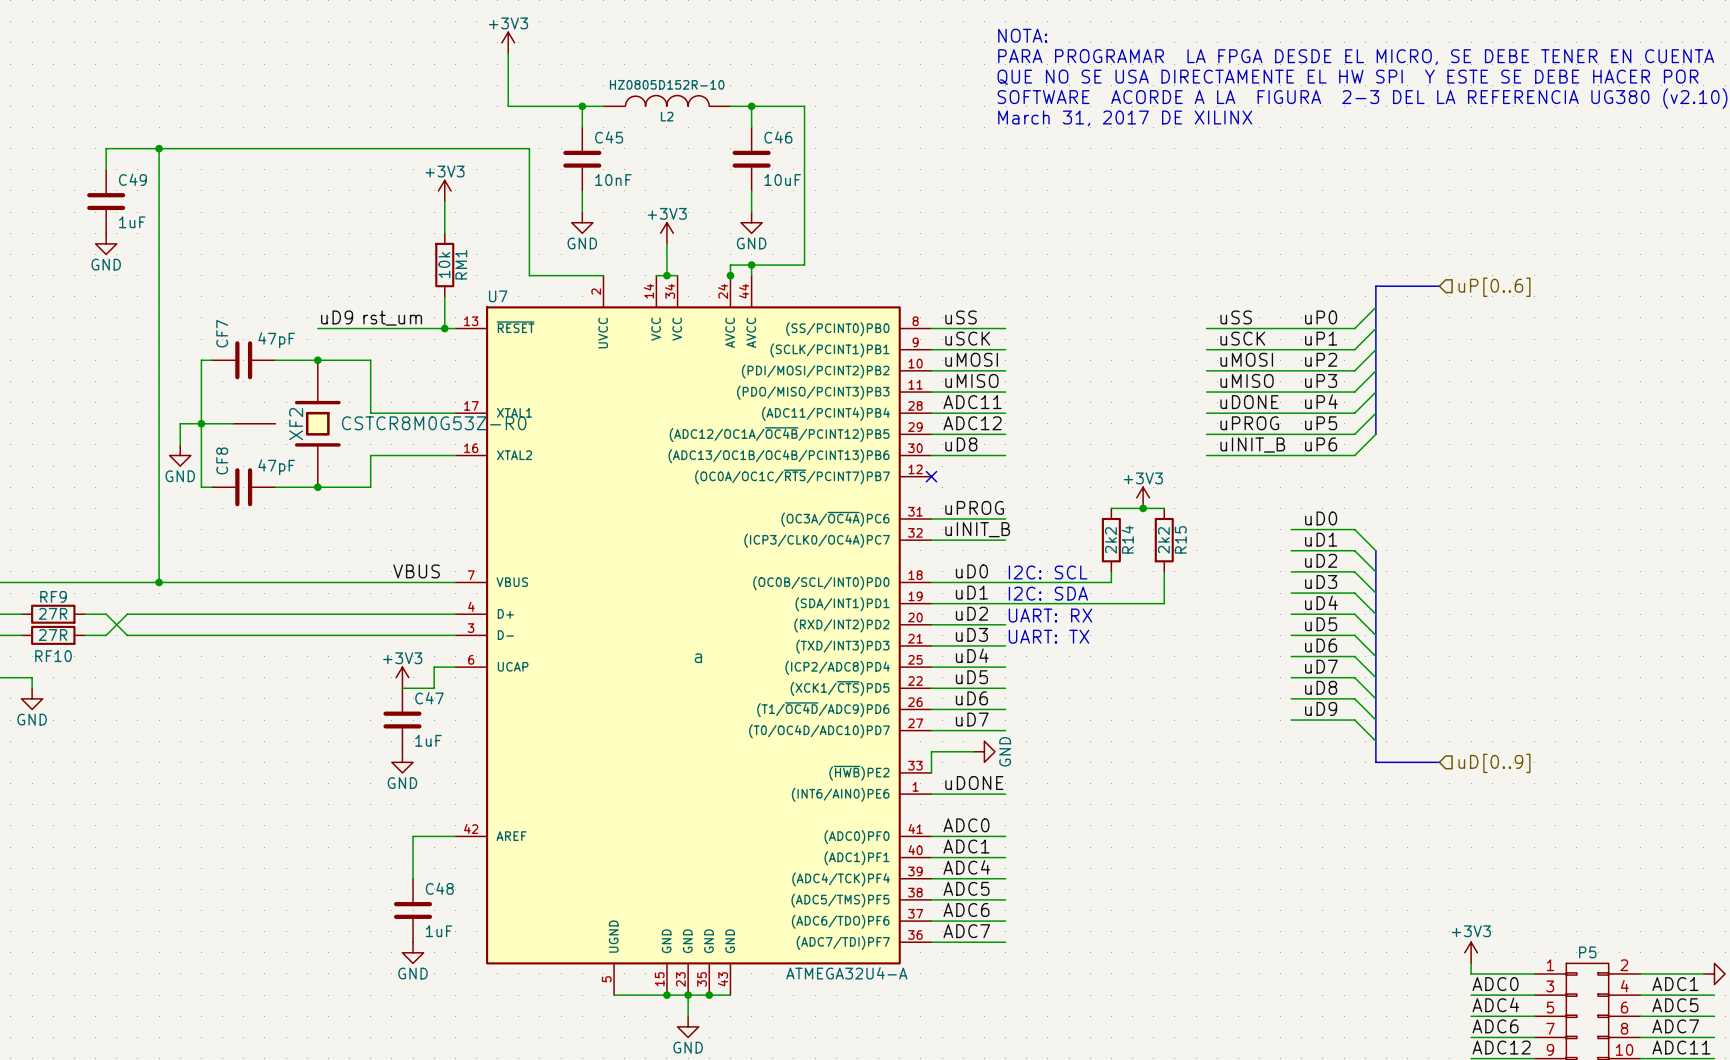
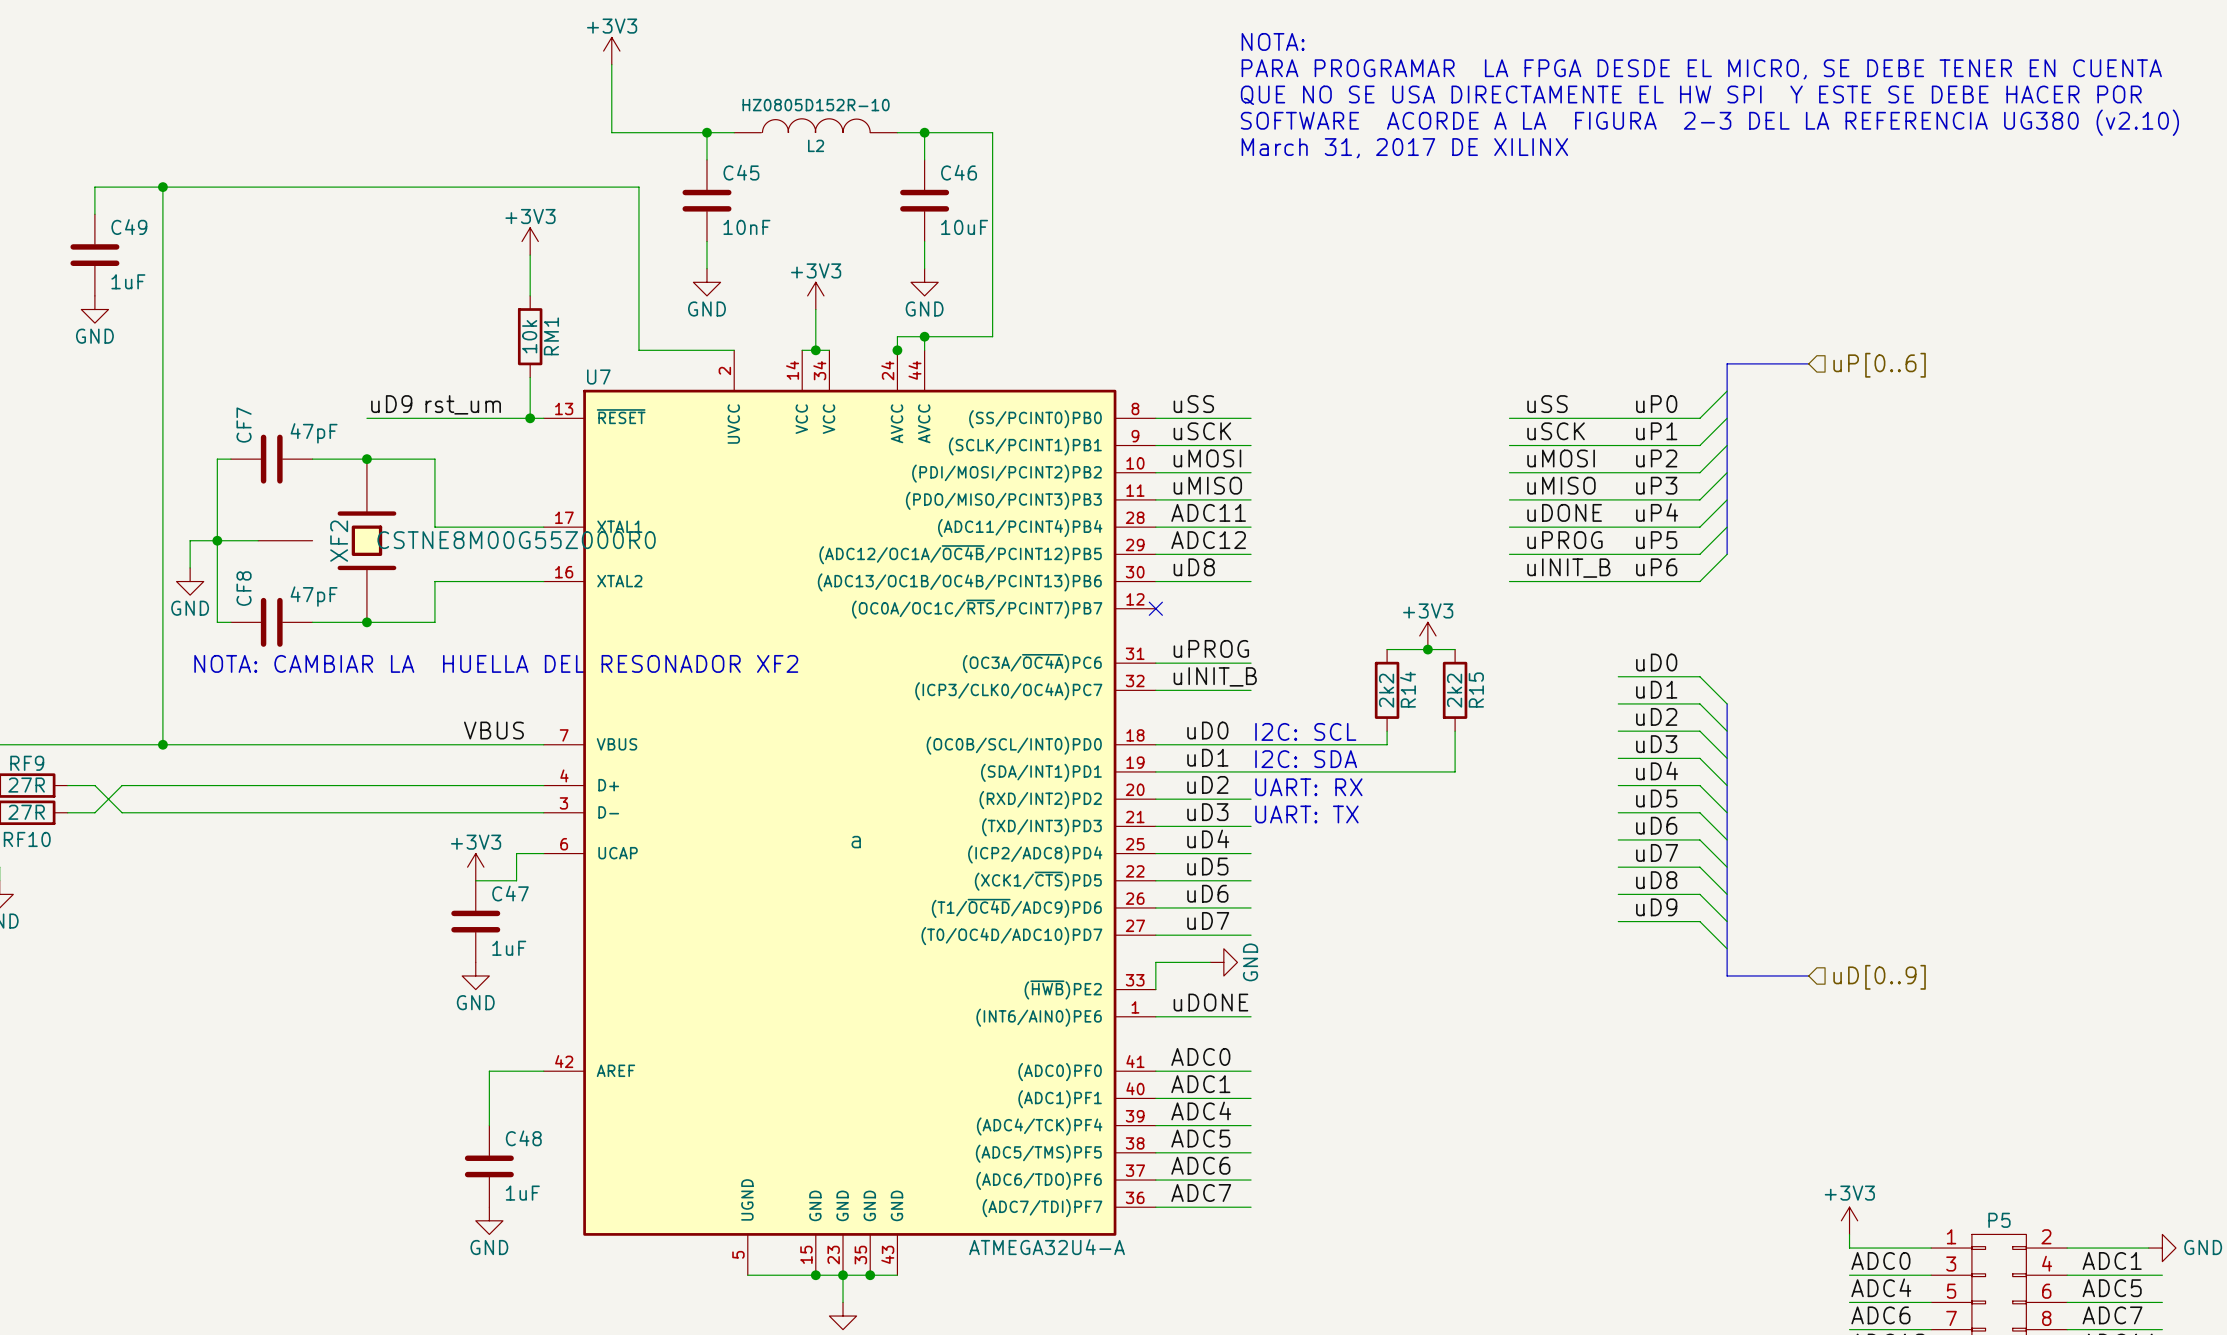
XF2 value: CSTCR8M0G53Z-R0 (434, 423) -> CSTNE8M00G55Z000R0 (516, 540)
text: none -> NOTA: CAMBIAR LA HUELLA DEL RESONADOR XF2 (496, 663)

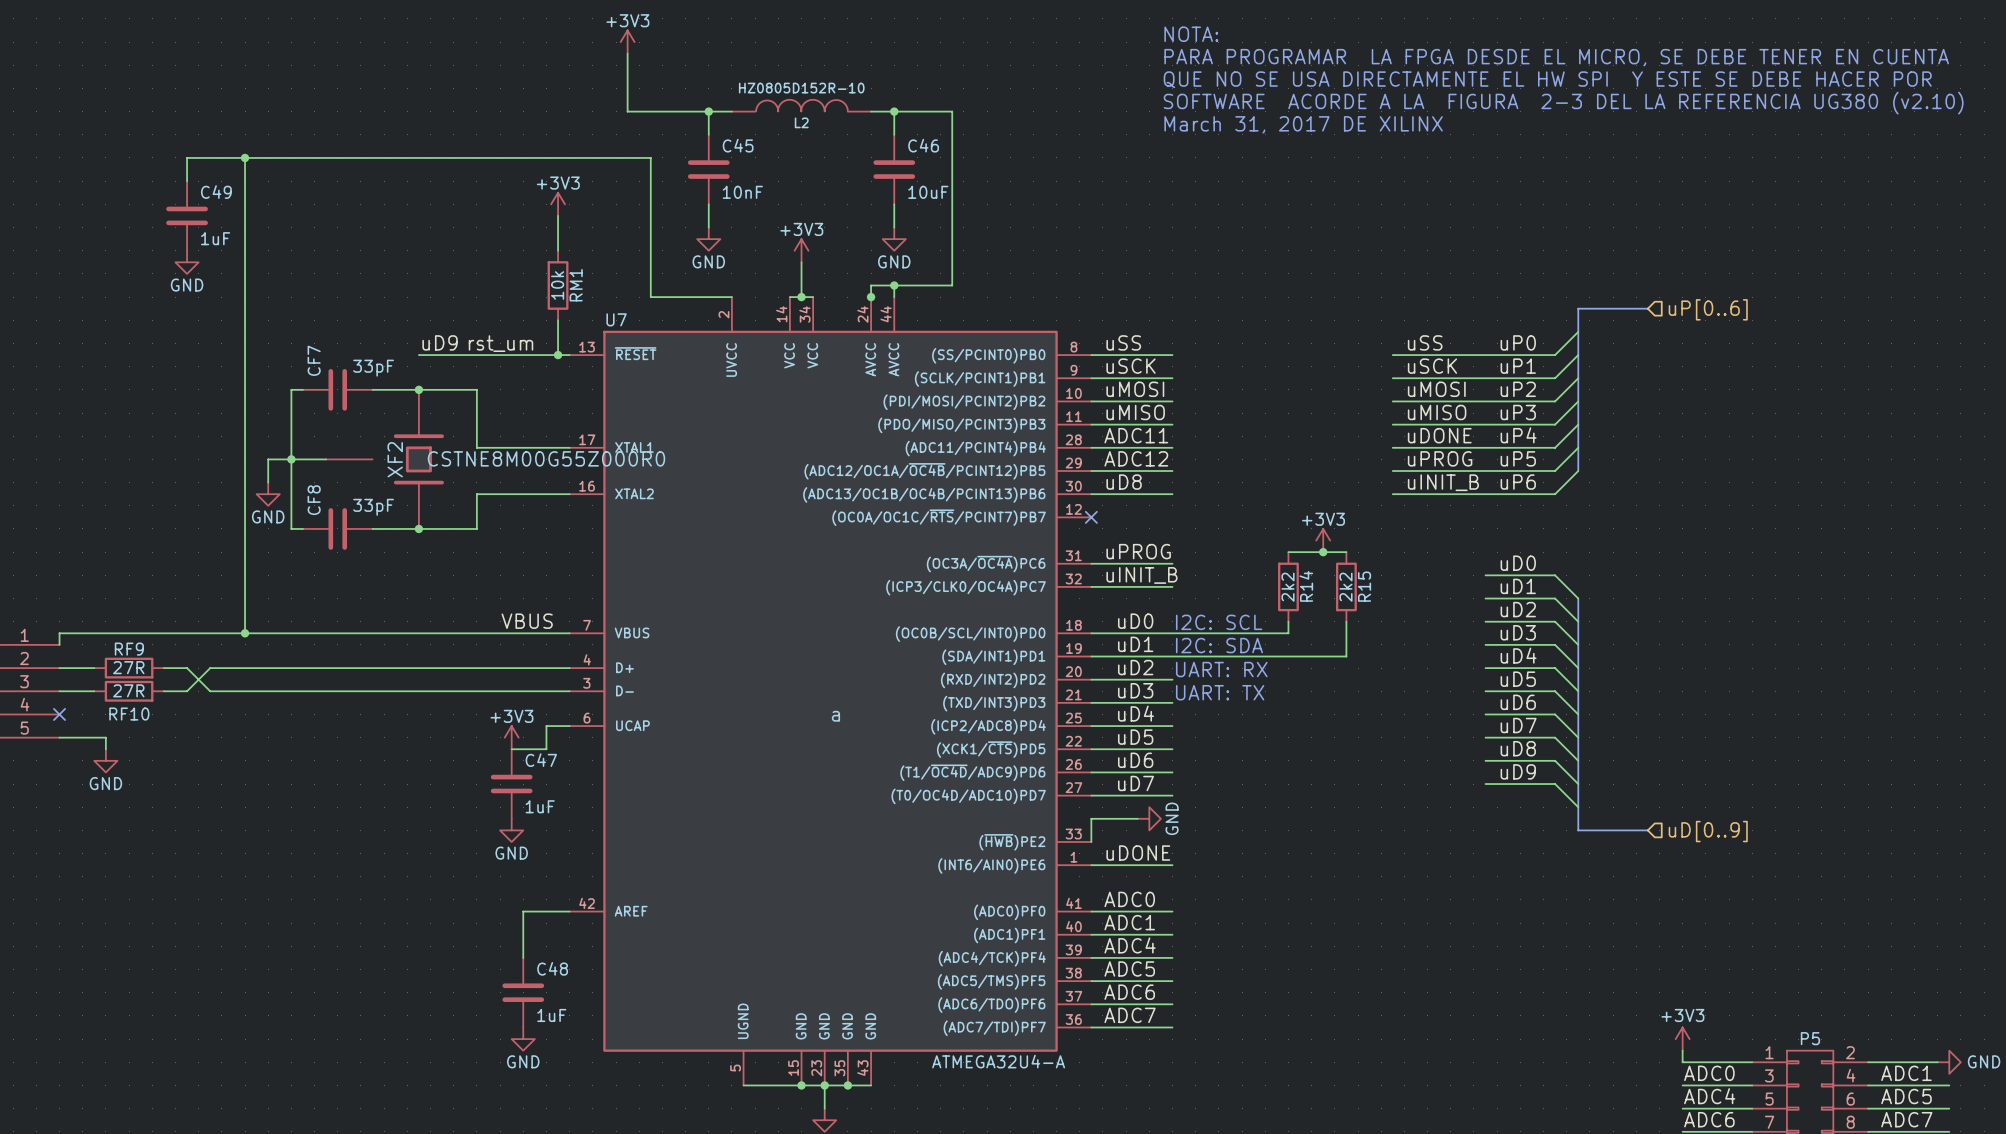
CF7 value: 47pF (314, 433) -> 33pF (373, 368)
CF8 value: 47pF (314, 596) -> 33pF (373, 507)
text: NOTA: CAMBIAR LA HUELLA DEL RESONADOR XF2 (496, 663) -> none

